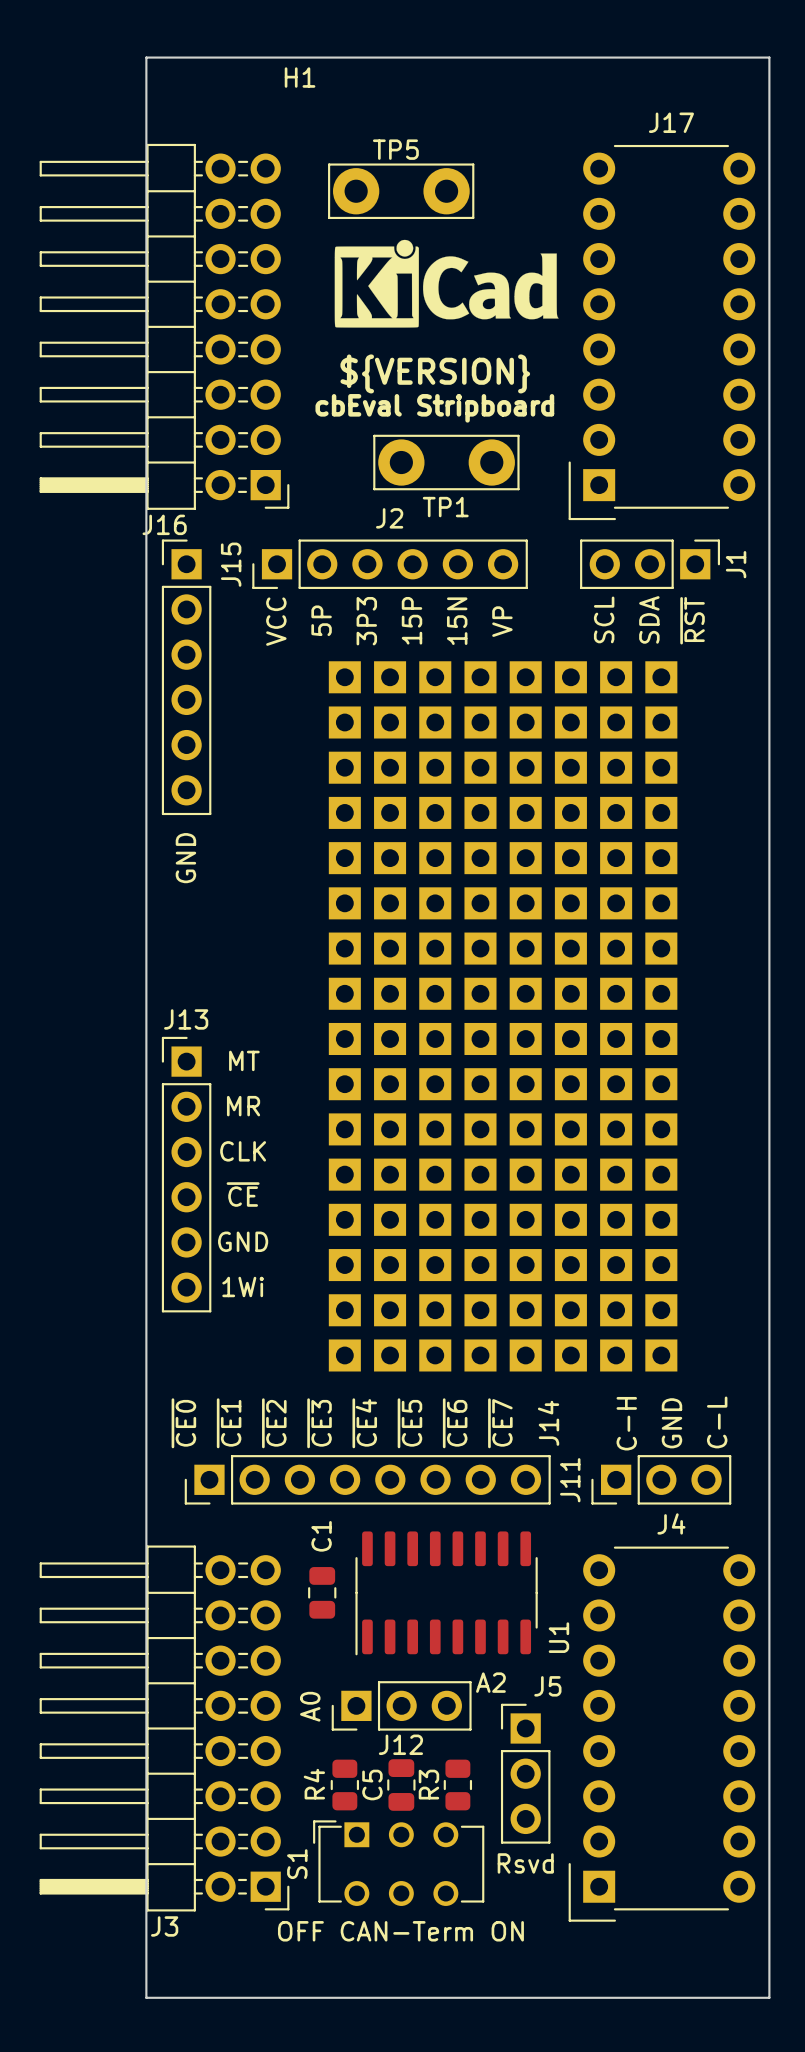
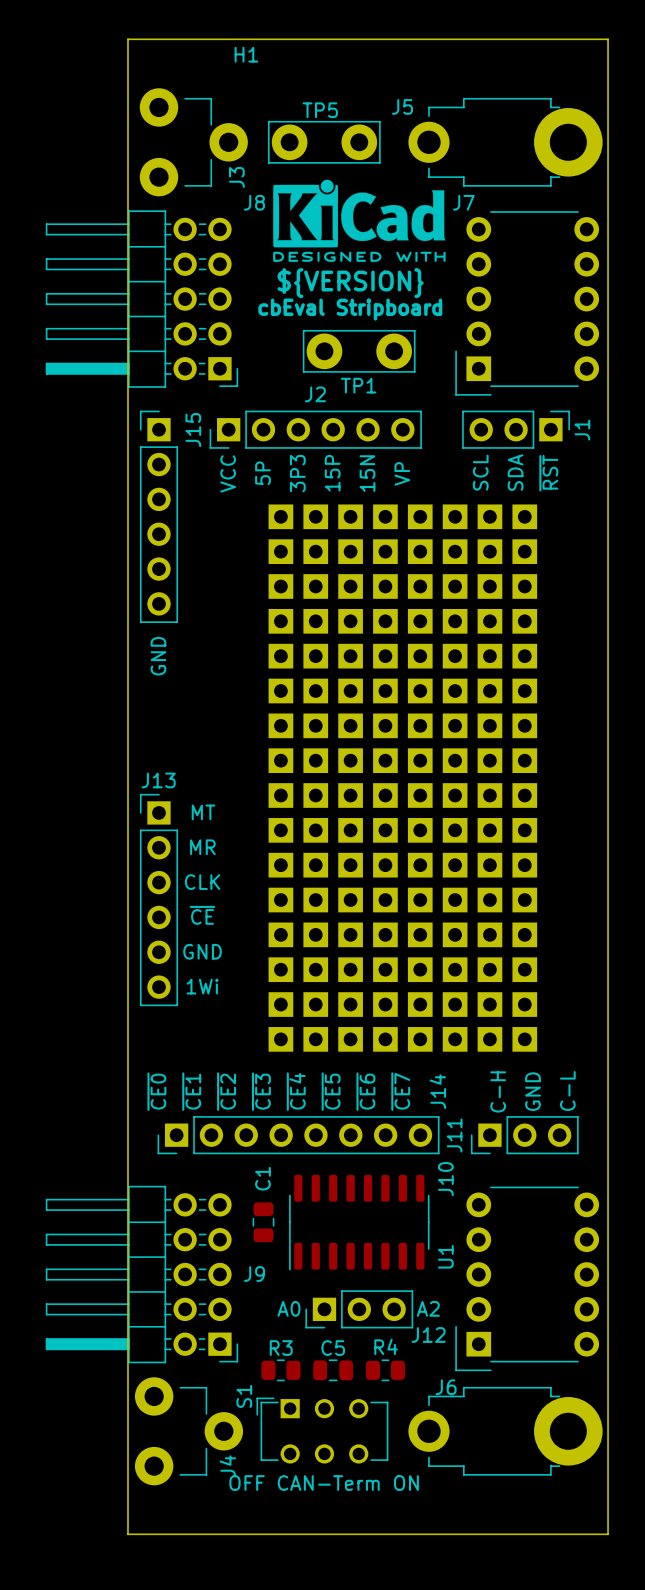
drawing shape: [334, 239, 559, 328] -> [273, 179, 446, 262]
J16: (164, 326) -> none
J17: (661, 332) -> none
J8: none -> (141, 299)
J7: none -> (527, 303)
J4 name position: J4 (671, 1523) -> J4 (227, 1466)
J3 footprint: [39, 1545, 290, 1912] -> [139, 88, 248, 197]
J4 footprint: [568, 1546, 756, 1922] -> [134, 1377, 244, 1486]
J9: none -> (141, 1274)
J10: none -> (527, 1278)
text position: A2 (490, 1682) -> A2 (428, 1308)
J5 name position: J5 (547, 1686) -> J5 (402, 106)
J5 footprint: [500, 1703, 551, 1844] -> [408, 97, 603, 187]
J12 position: (401, 1705) -> (359, 1309)
text rotation: 0° (310, 1706) -> 90° clockwise (288, 1308)
text position: A0 (310, 1706) -> A0 (288, 1308)
J12 name position: J12 (400, 1744) -> J12 (428, 1334)
R4 rotation: 0° (344, 1785) -> 90° clockwise (385, 1370)
R4 position: (344, 1785) -> (385, 1370)
C5 rotation: 0° (401, 1785) -> 90° clockwise (333, 1370)
R3 rotation: 0° (457, 1785) -> 90° clockwise (280, 1370)
R3 position: (457, 1785) -> (280, 1370)
text: Rsvd (525, 1863) -> none
S1 name position: S1 (297, 1864) -> S1 (244, 1396)
J6: none -> (505, 1431)
J3 name position: J3 (164, 1926) -> J3 (236, 177)

